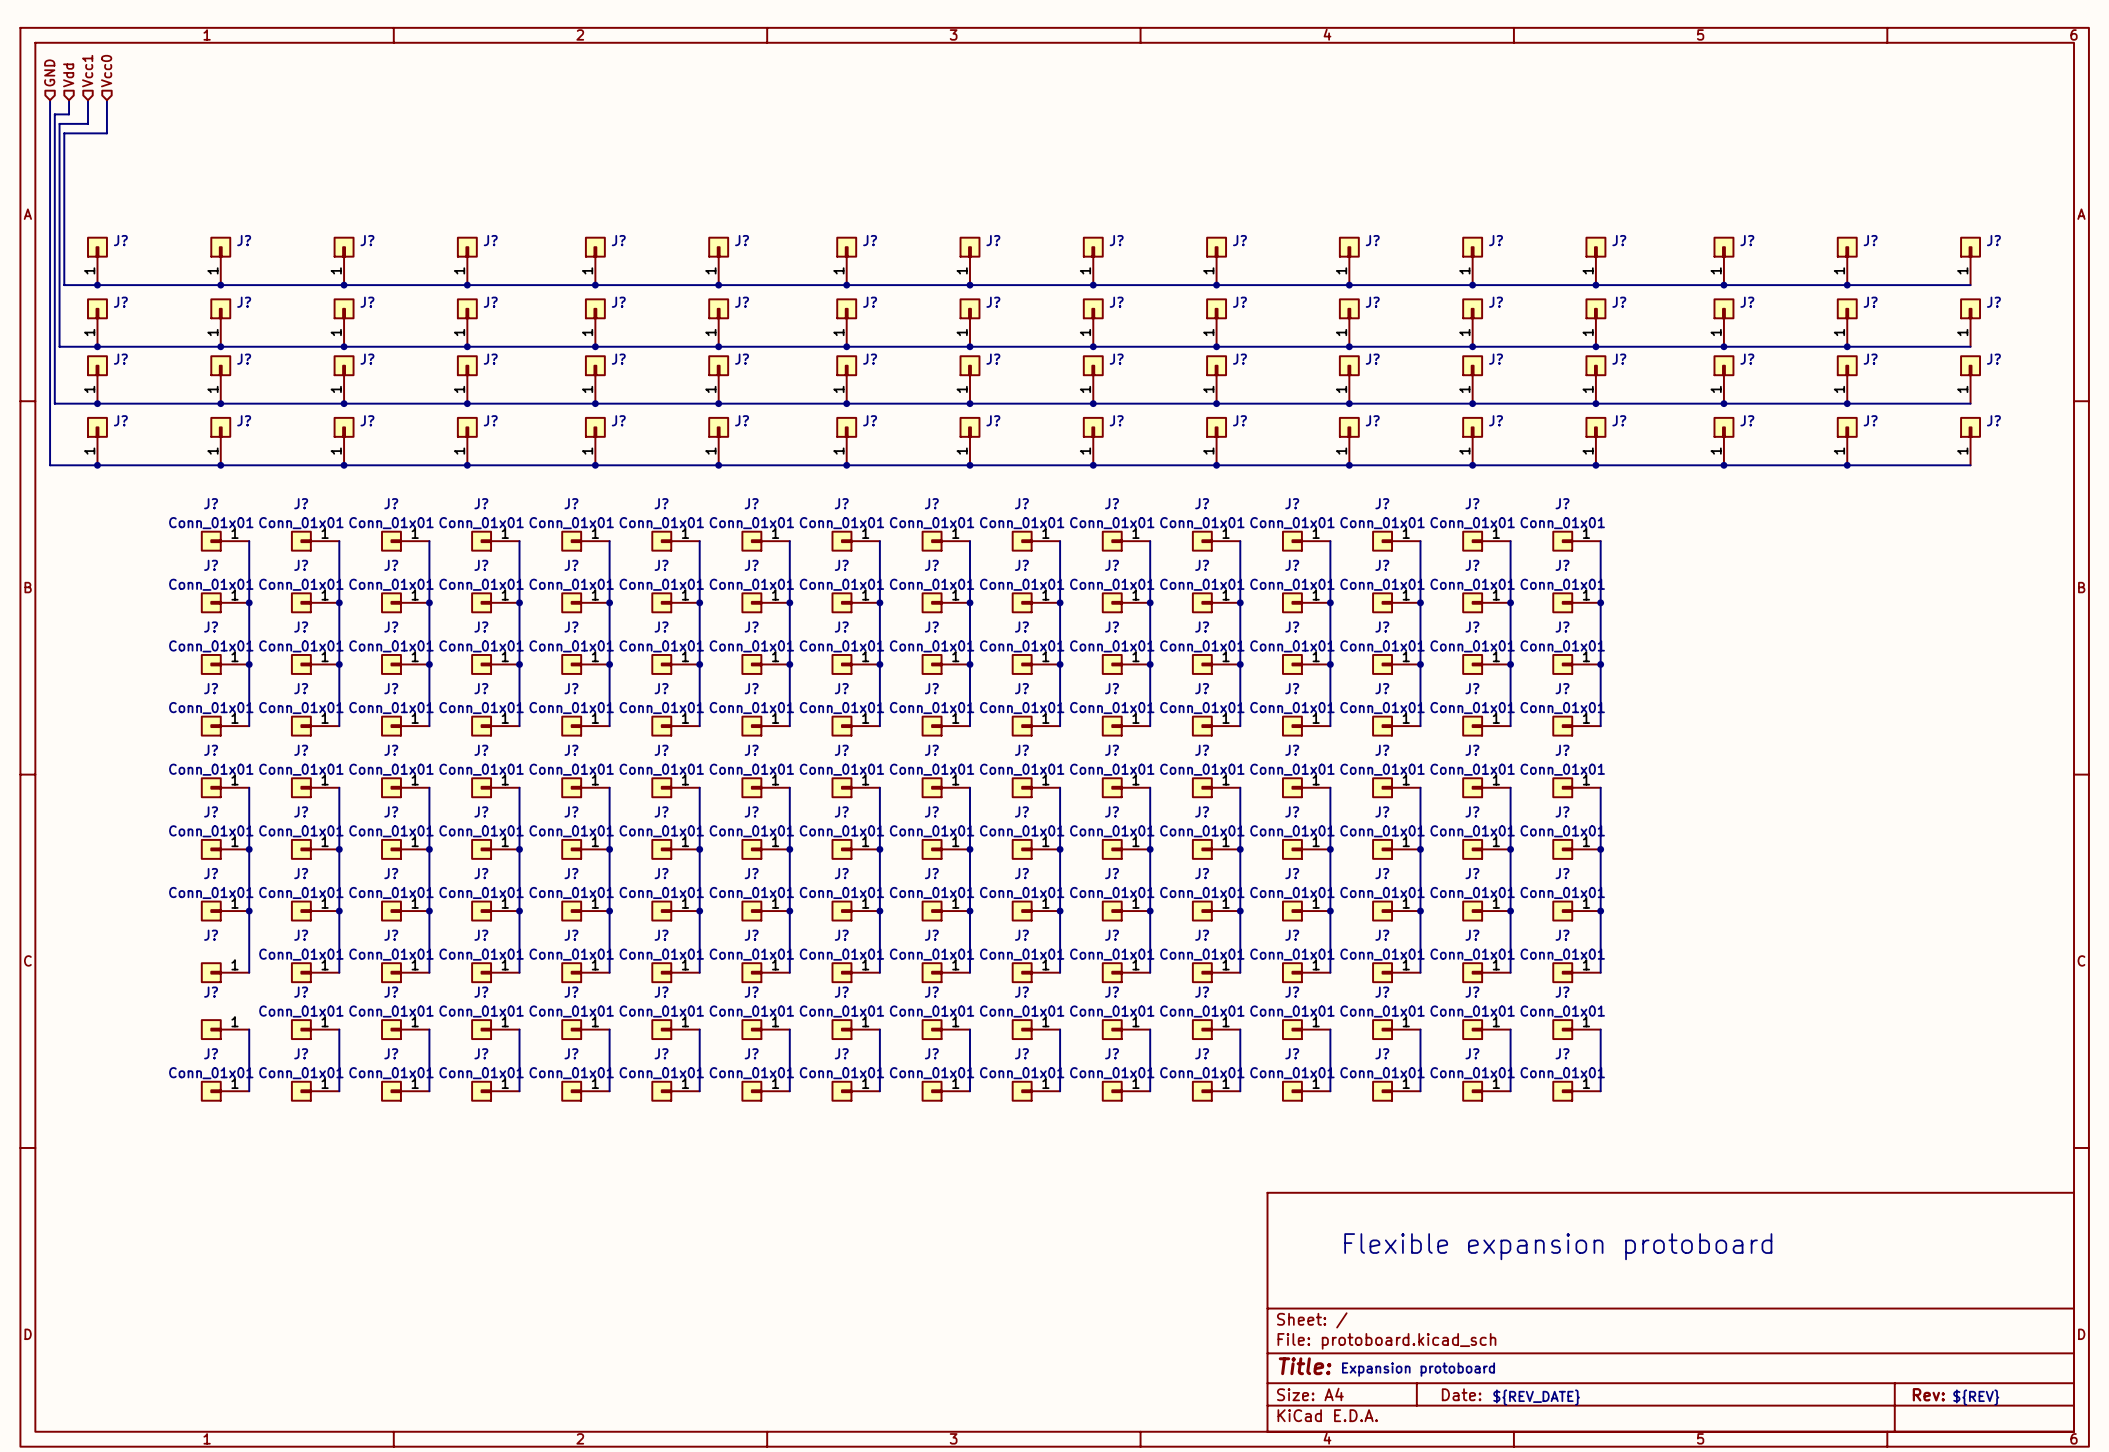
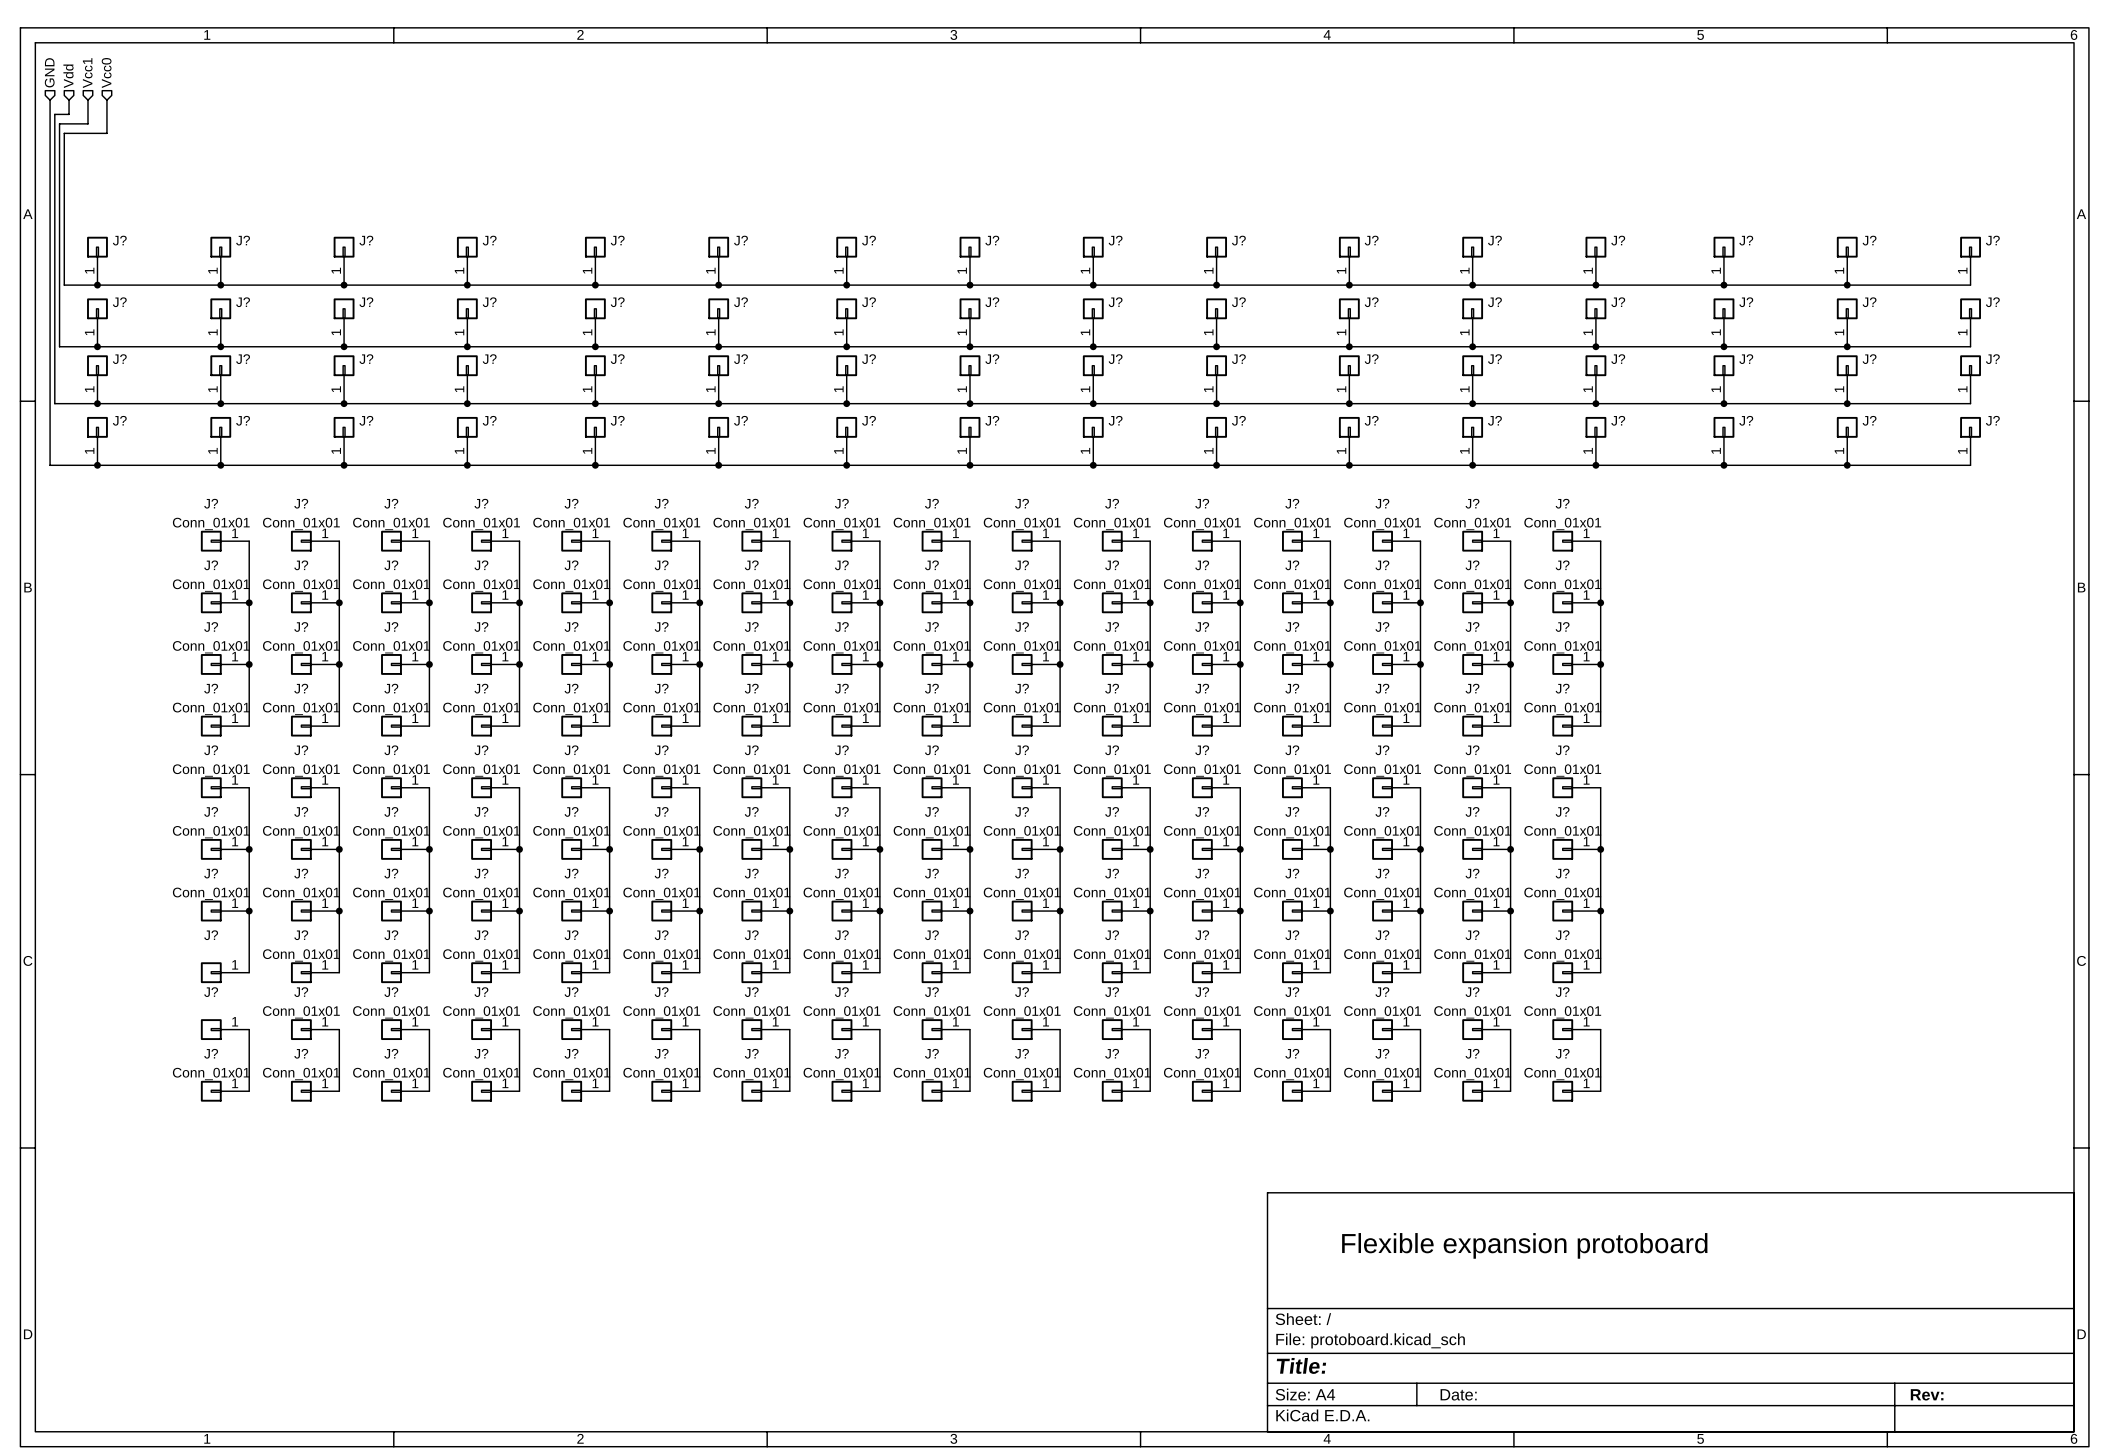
text: Expansion protoboard (1418, 1369) -> none
text: ${REV_DATE} (1536, 1397) -> none
text: ${REV} (1976, 1397) -> none

